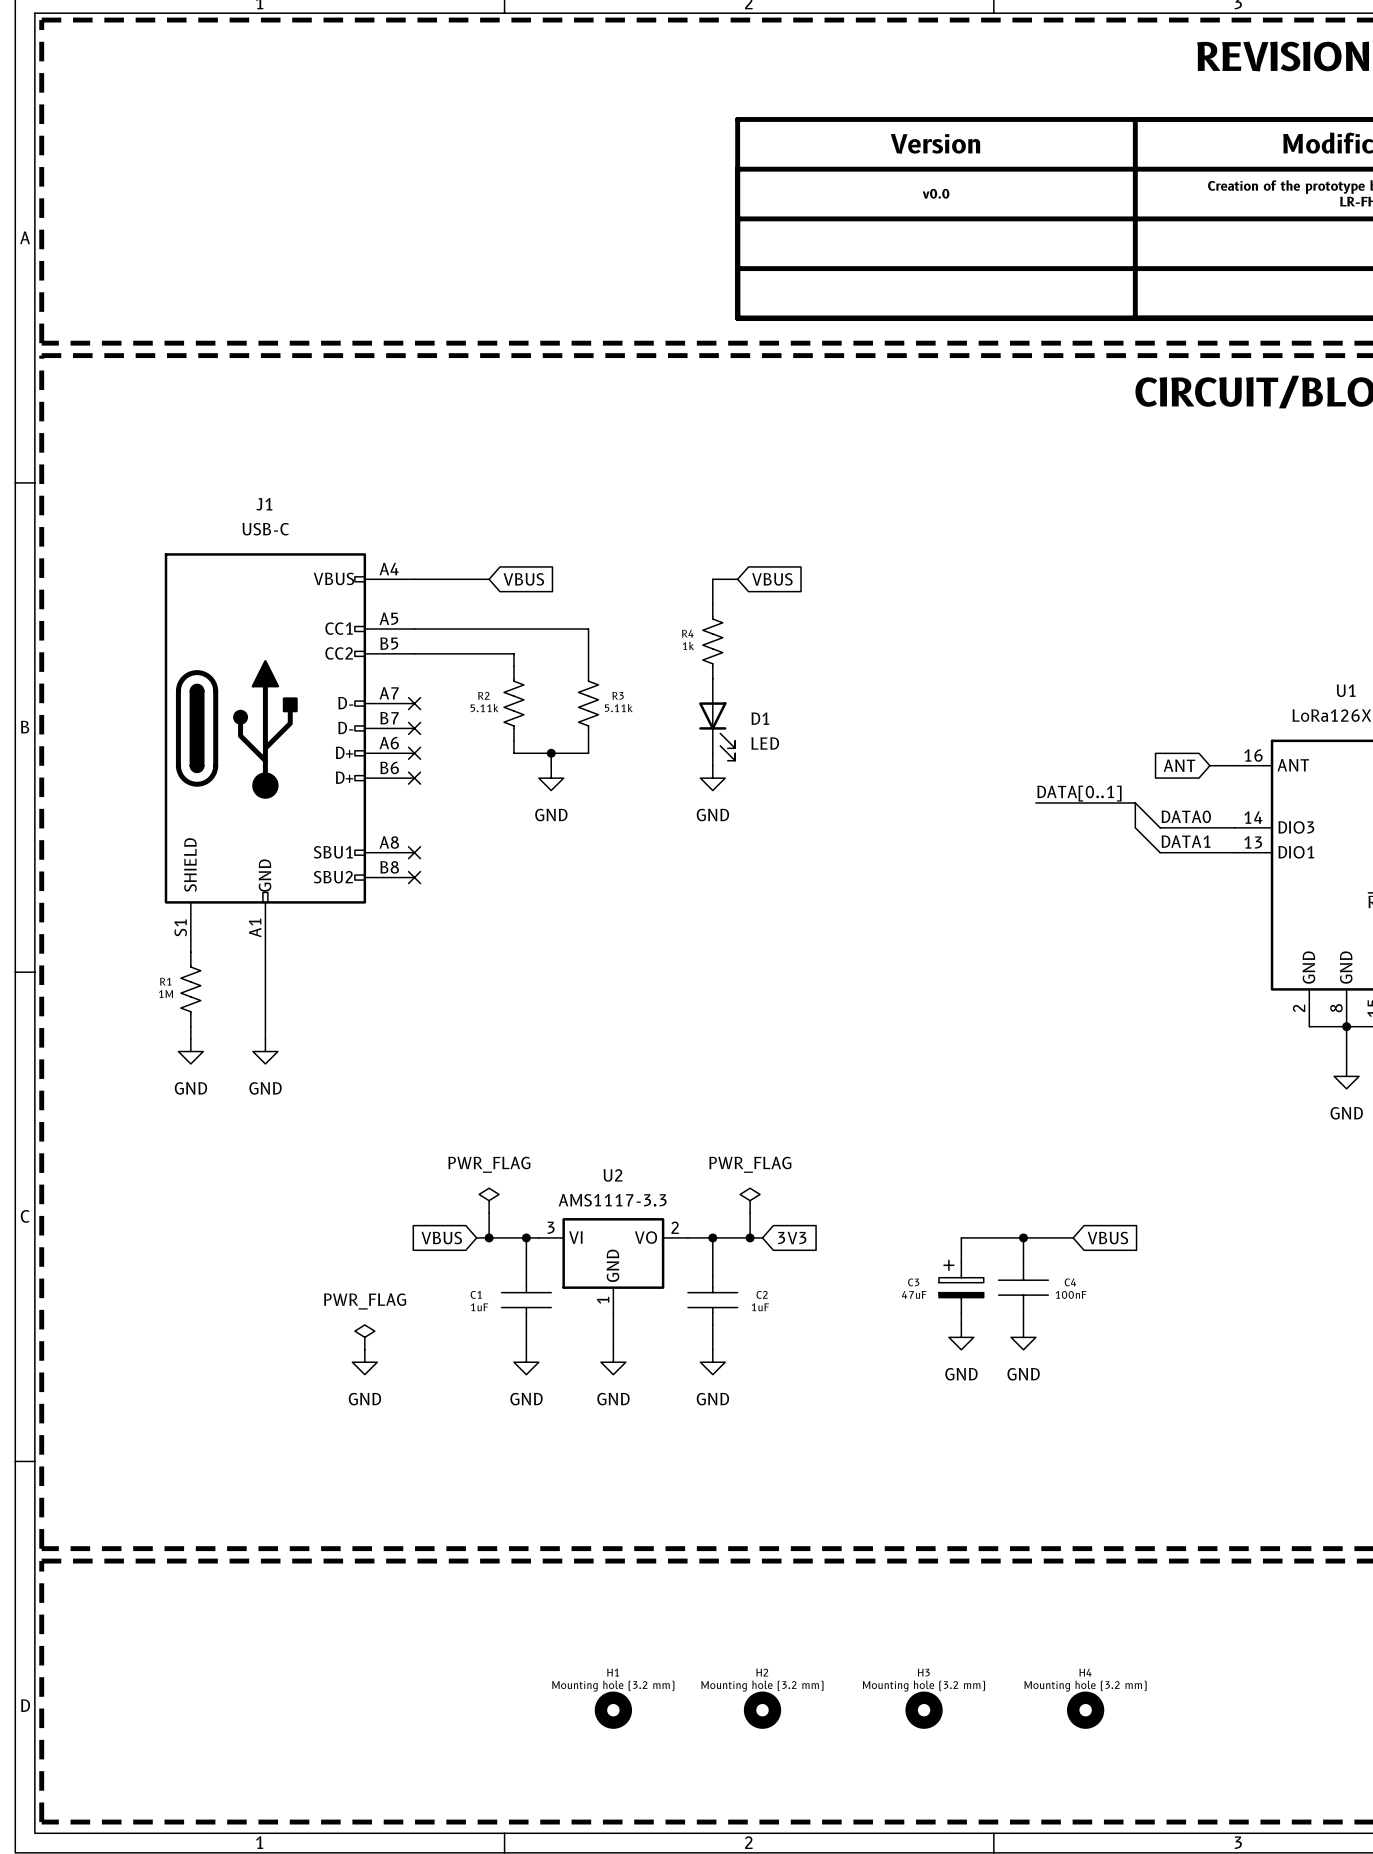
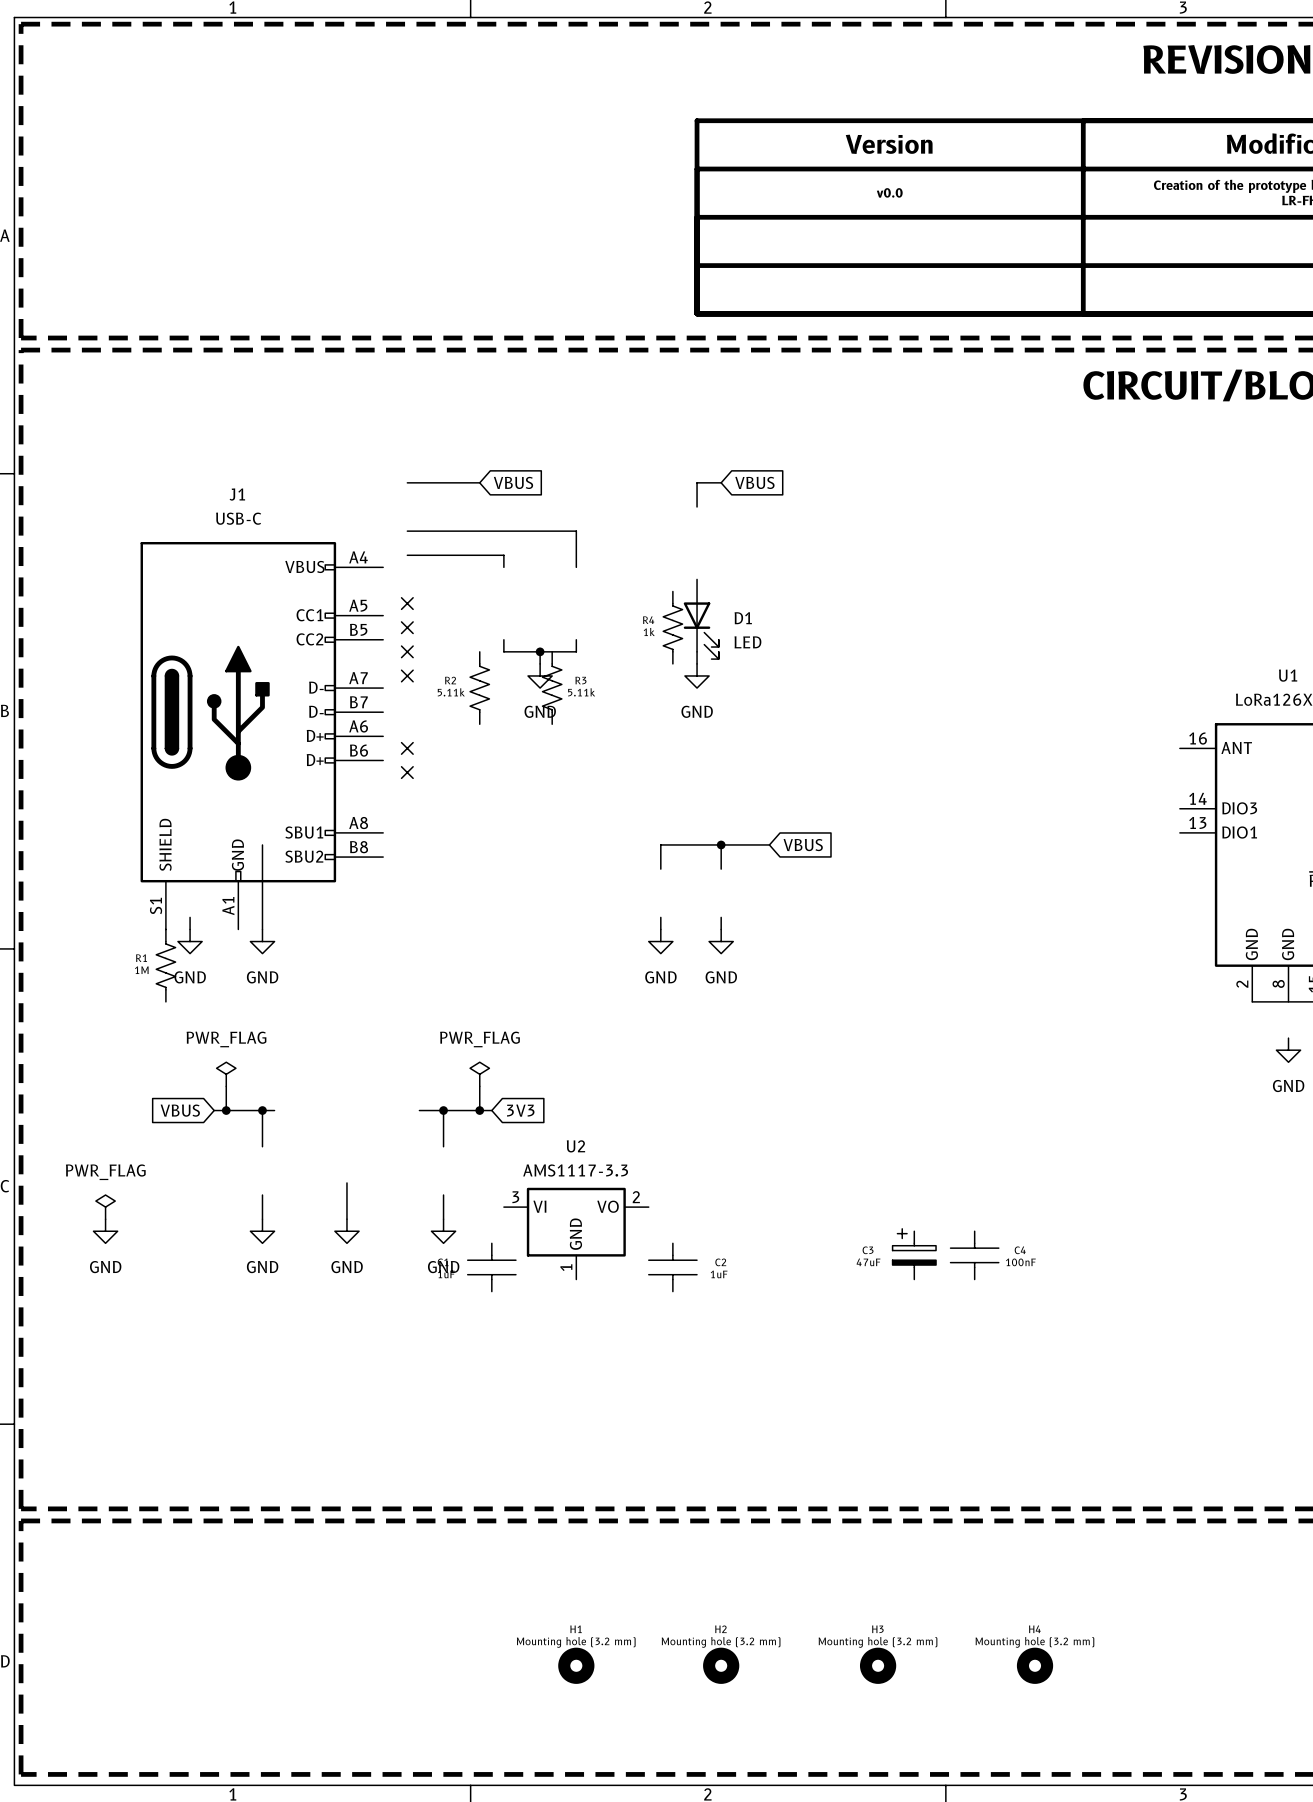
wire: (414, 579) (489, 579) -> (407, 482) (479, 482)
global label position: VBUS (523, 579) -> VBUS (513, 482)
wire: (737, 579) (712, 579) (712, 604) -> (721, 482) (697, 482) (697, 506)
global label position: VBUS (772, 579) -> VBUS (754, 482)
no-connect mark: none -> (407, 603)
wire: (414, 629) (588, 629) (588, 666) -> (407, 531) (576, 531) (576, 567)
no-connect mark: none -> (407, 627)
wire: (414, 653) (513, 653) (513, 666) -> (407, 555) (503, 555) (503, 567)
no-connect mark: none -> (407, 651)
junction: none -> (540, 651)
no-connect mark: none -> (407, 675)
power symbol: none -> GND (540, 675)
power symbol: none -> GND (697, 675)
no-connect mark: (414, 703) -> none
D1 position: (717, 719) -> (701, 619)
no-connect mark: (414, 728) -> none
wire: (513, 740) (513, 753) (588, 753) (588, 740) -> (503, 639) (503, 651) (576, 651) (576, 639)
no-connect mark: (414, 753) -> none
wire: (551, 753) (551, 765) -> (540, 651) (540, 663)
junction: (551, 753) -> none
wire: (712, 753) (712, 765) -> (697, 651) (697, 663)
no-connect mark: none -> (407, 748)
global label: ANT (1179, 765) -> none
wire: (1209, 765) (1234, 765) -> none
no-connect mark: (414, 778) -> none
power symbol: GND (551, 778) -> none
power symbol: GND (712, 778) -> none
no-connect mark: none -> (407, 772)
label: DATA[0..1] (1079, 793) -> none
bus: (1035, 802) (1135, 802) (1135, 827) -> none
wire: (1135, 802) (1160, 827) (1234, 827) -> none
label: DATA0 (1186, 816) -> none
wire: (1135, 827) (1160, 852) (1234, 852) -> none
label: DATA1 (1186, 841) -> none
no-connect mark: (414, 852) -> none
wire: none -> (721, 844) (721, 869)
junction: none -> (721, 844)
wire: none -> (769, 844) (660, 844) (660, 869)
global label: none -> VBUS (803, 845)
no-connect mark: (414, 877) -> none
wire: none -> (660, 917) (660, 929)
wire: none -> (721, 917) (721, 929)
wire: (265, 952) (265, 1039) -> (262, 844) (262, 929)
power symbol: none -> GND (190, 941)
power symbol: none -> GND (262, 941)
power symbol: none -> GND (660, 941)
power symbol: none -> GND (721, 941)
wire: (190, 1026) (190, 1039) -> (190, 917) (190, 929)
wire: (1346, 1026) (1346, 1063) -> none
junction: (1346, 1026) -> none
power symbol: GND (190, 1051) -> none
power symbol: GND (265, 1051) -> none
power symbol: none -> PWR_FLAG (226, 1074)
wire: none -> (226, 1086) (226, 1110)
global label: none -> VBUS (180, 1110)
wire: none -> (214, 1110) (274, 1110)
junction: none -> (226, 1110)
wire: none -> (262, 1110) (262, 1146)
junction: none -> (262, 1110)
wire: none -> (419, 1110) (491, 1110)
junction: none -> (443, 1110)
junction: none -> (479, 1110)
global label: none -> 3V3 (520, 1110)
power symbol position: PWR_FLAG (489, 1200) -> PWR_FLAG (479, 1074)
power symbol: PWR_FLAG (750, 1200) -> none
wire: none -> (346, 1182) (346, 1219)
wire: (489, 1213) (489, 1237) -> (479, 1086) (479, 1110)
wire: (750, 1213) (750, 1237) -> none
wire: none -> (262, 1195) (262, 1219)
power symbol: none -> PWR_FLAG (105, 1207)
wire: (476, 1237) (538, 1237) -> none
junction: (489, 1237) -> none
wire: (526, 1237) (526, 1275) -> (443, 1110) (443, 1146)
junction: (526, 1237) -> none
wire: (687, 1237) (762, 1237) -> none
wire: (712, 1237) (712, 1275) -> none
junction: (712, 1237) -> none
junction: (750, 1237) -> none
wire: (1023, 1237) (1023, 1262) -> none
junction: (1023, 1237) -> none
wire: (1073, 1237) (961, 1237) (961, 1262) -> none
global label: VBUS (441, 1238) -> none
global label: 3V3 (792, 1238) -> none
global label: VBUS (1107, 1238) -> none
power symbol: none -> GND (105, 1231)
power symbol: none -> GND (262, 1231)
power symbol: none -> GND (346, 1231)
power symbol: none -> GND (443, 1231)
wire: (613, 1312) (613, 1349) -> none
wire: (961, 1312) (961, 1324) -> none
wire: (1023, 1312) (1023, 1324) -> none
wire: (526, 1324) (526, 1349) -> (443, 1195) (443, 1219)
wire: (712, 1324) (712, 1349) -> none
power symbol: PWR_FLAG (364, 1337) -> none
power symbol: GND (961, 1337) -> none
power symbol: GND (1023, 1337) -> none
power symbol: GND (364, 1362) -> none
power symbol: GND (526, 1362) -> none
power symbol: GND (613, 1362) -> none
power symbol: GND (712, 1362) -> none

